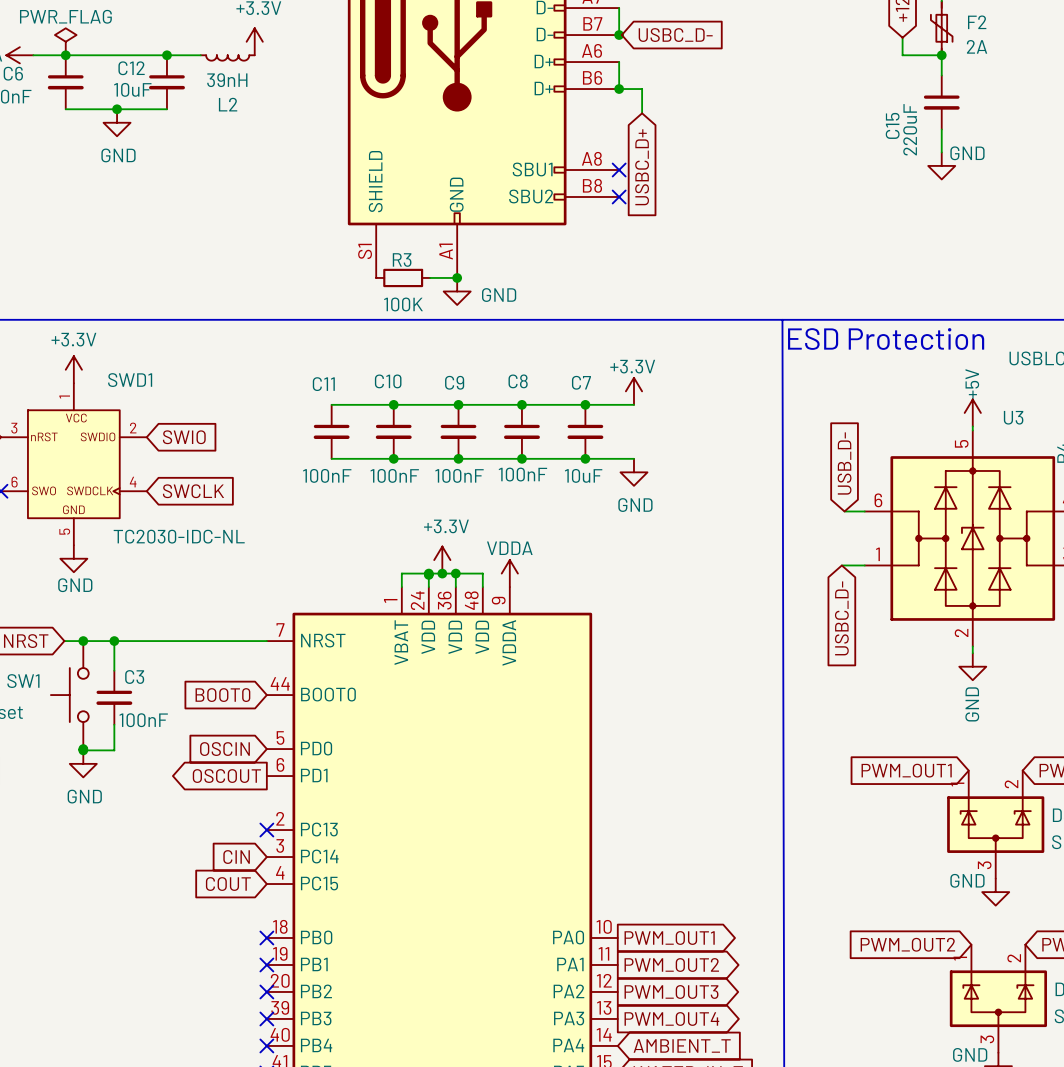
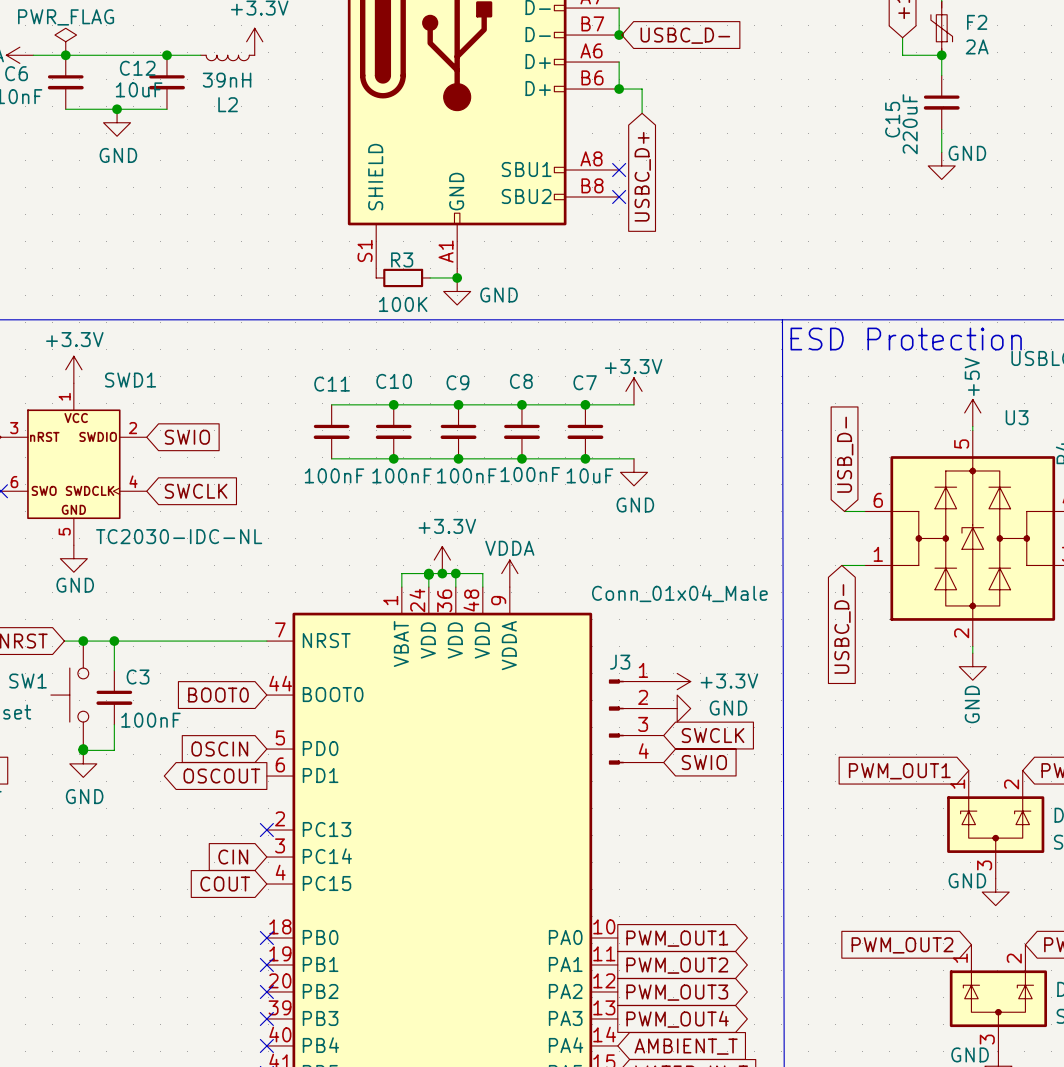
power symbol: none -> +3.3V (677, 681)
power symbol: none -> GND (677, 708)
J3: none -> Conn_01x04_Male (636, 722)
global label: none -> SWCLK (713, 735)
global label: none -> SWIO (704, 762)

